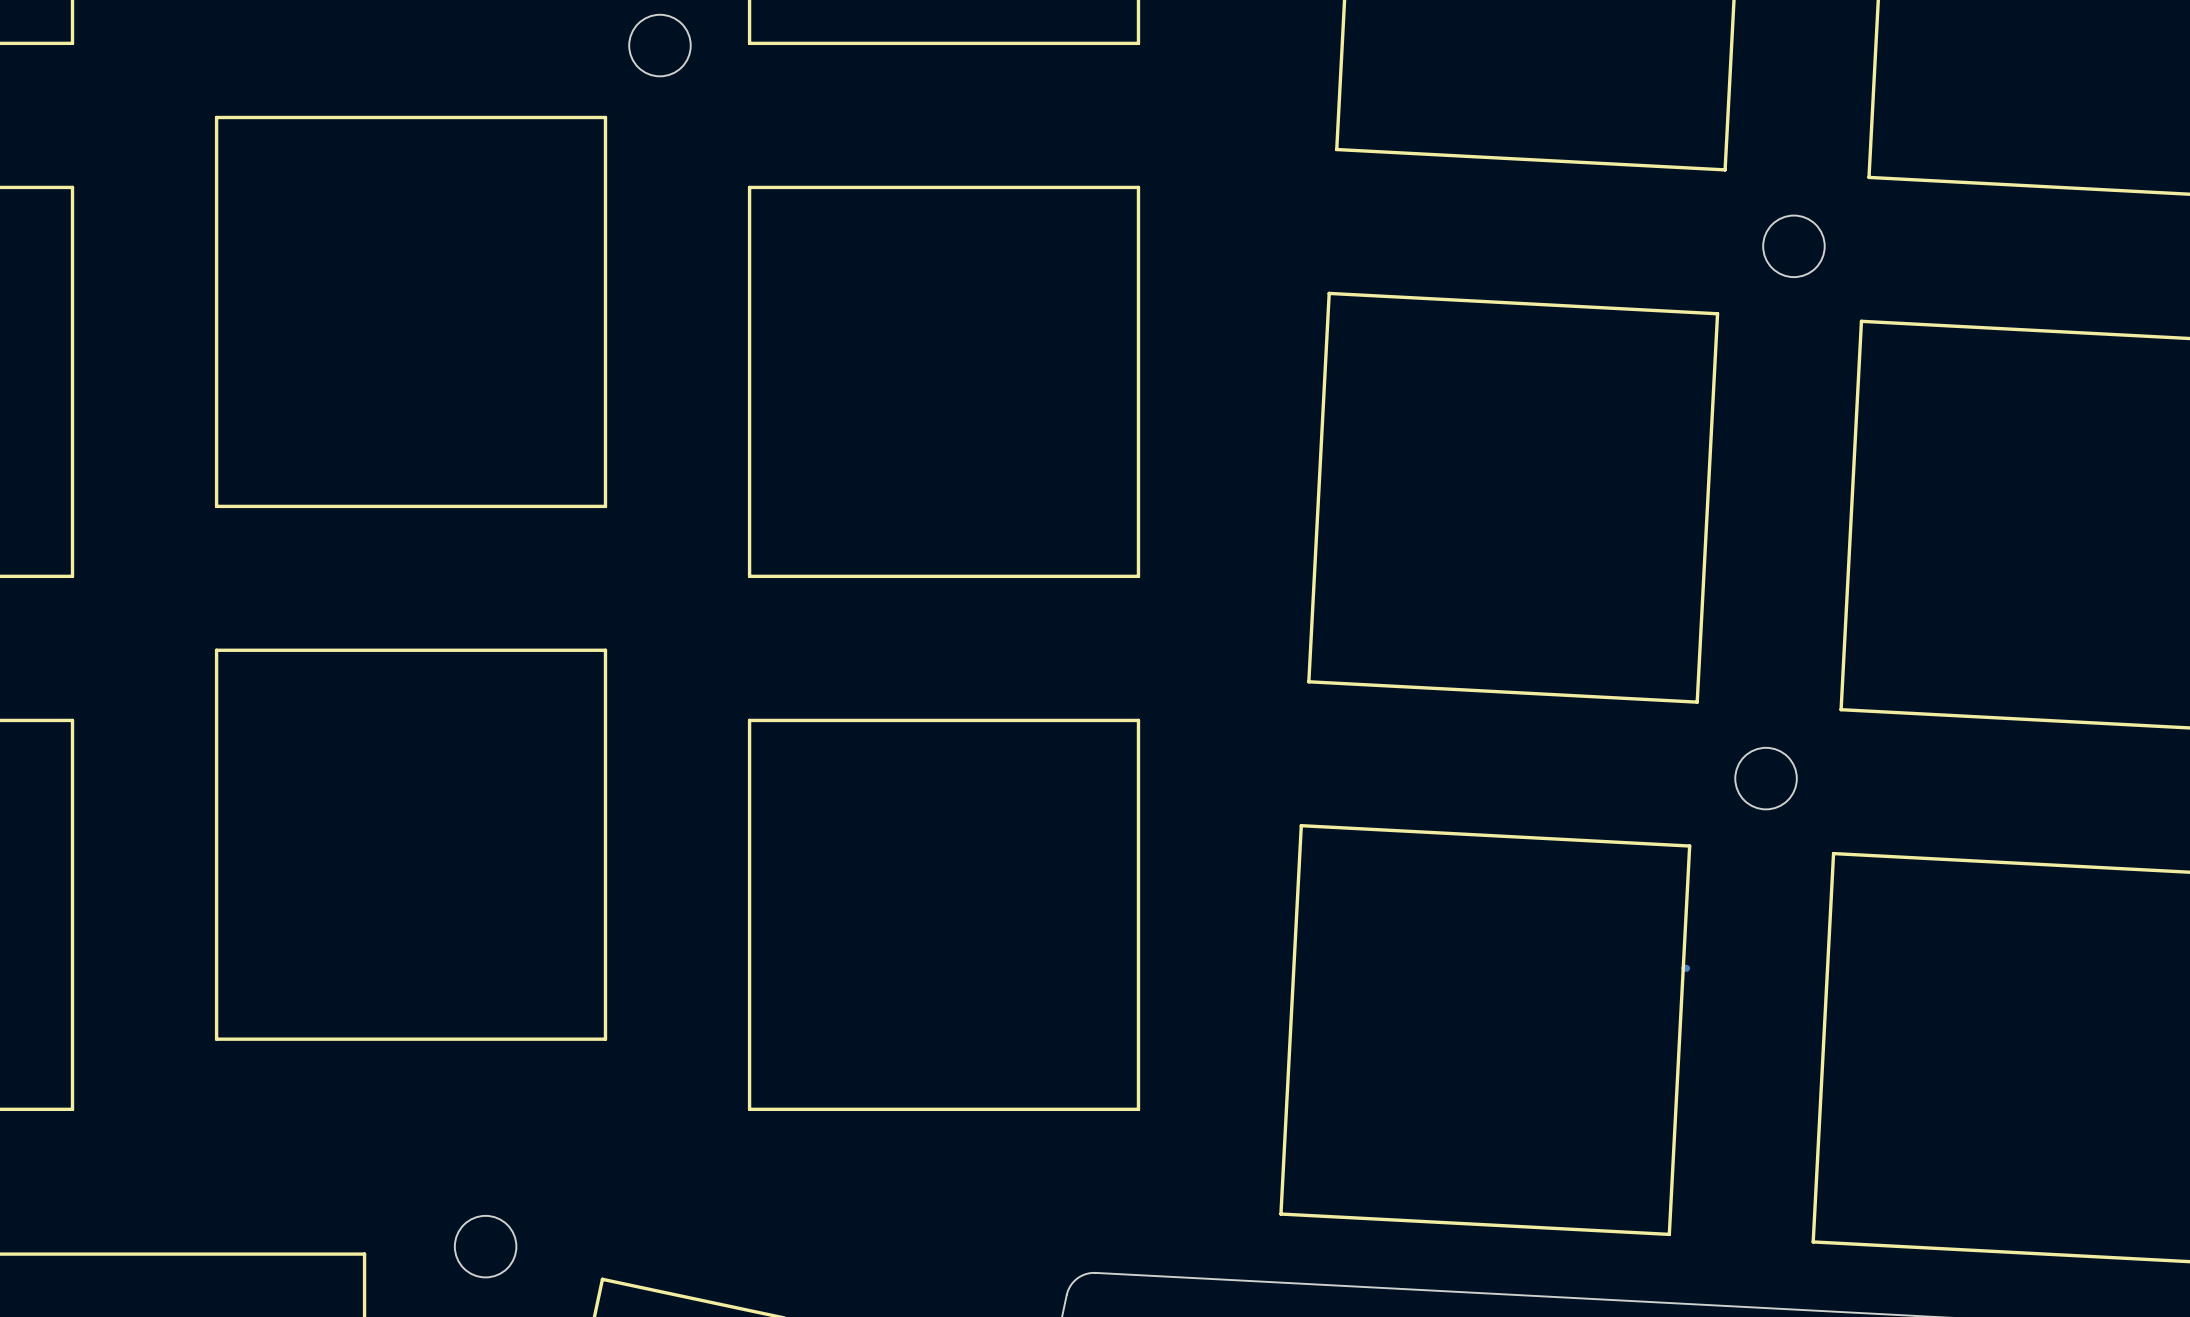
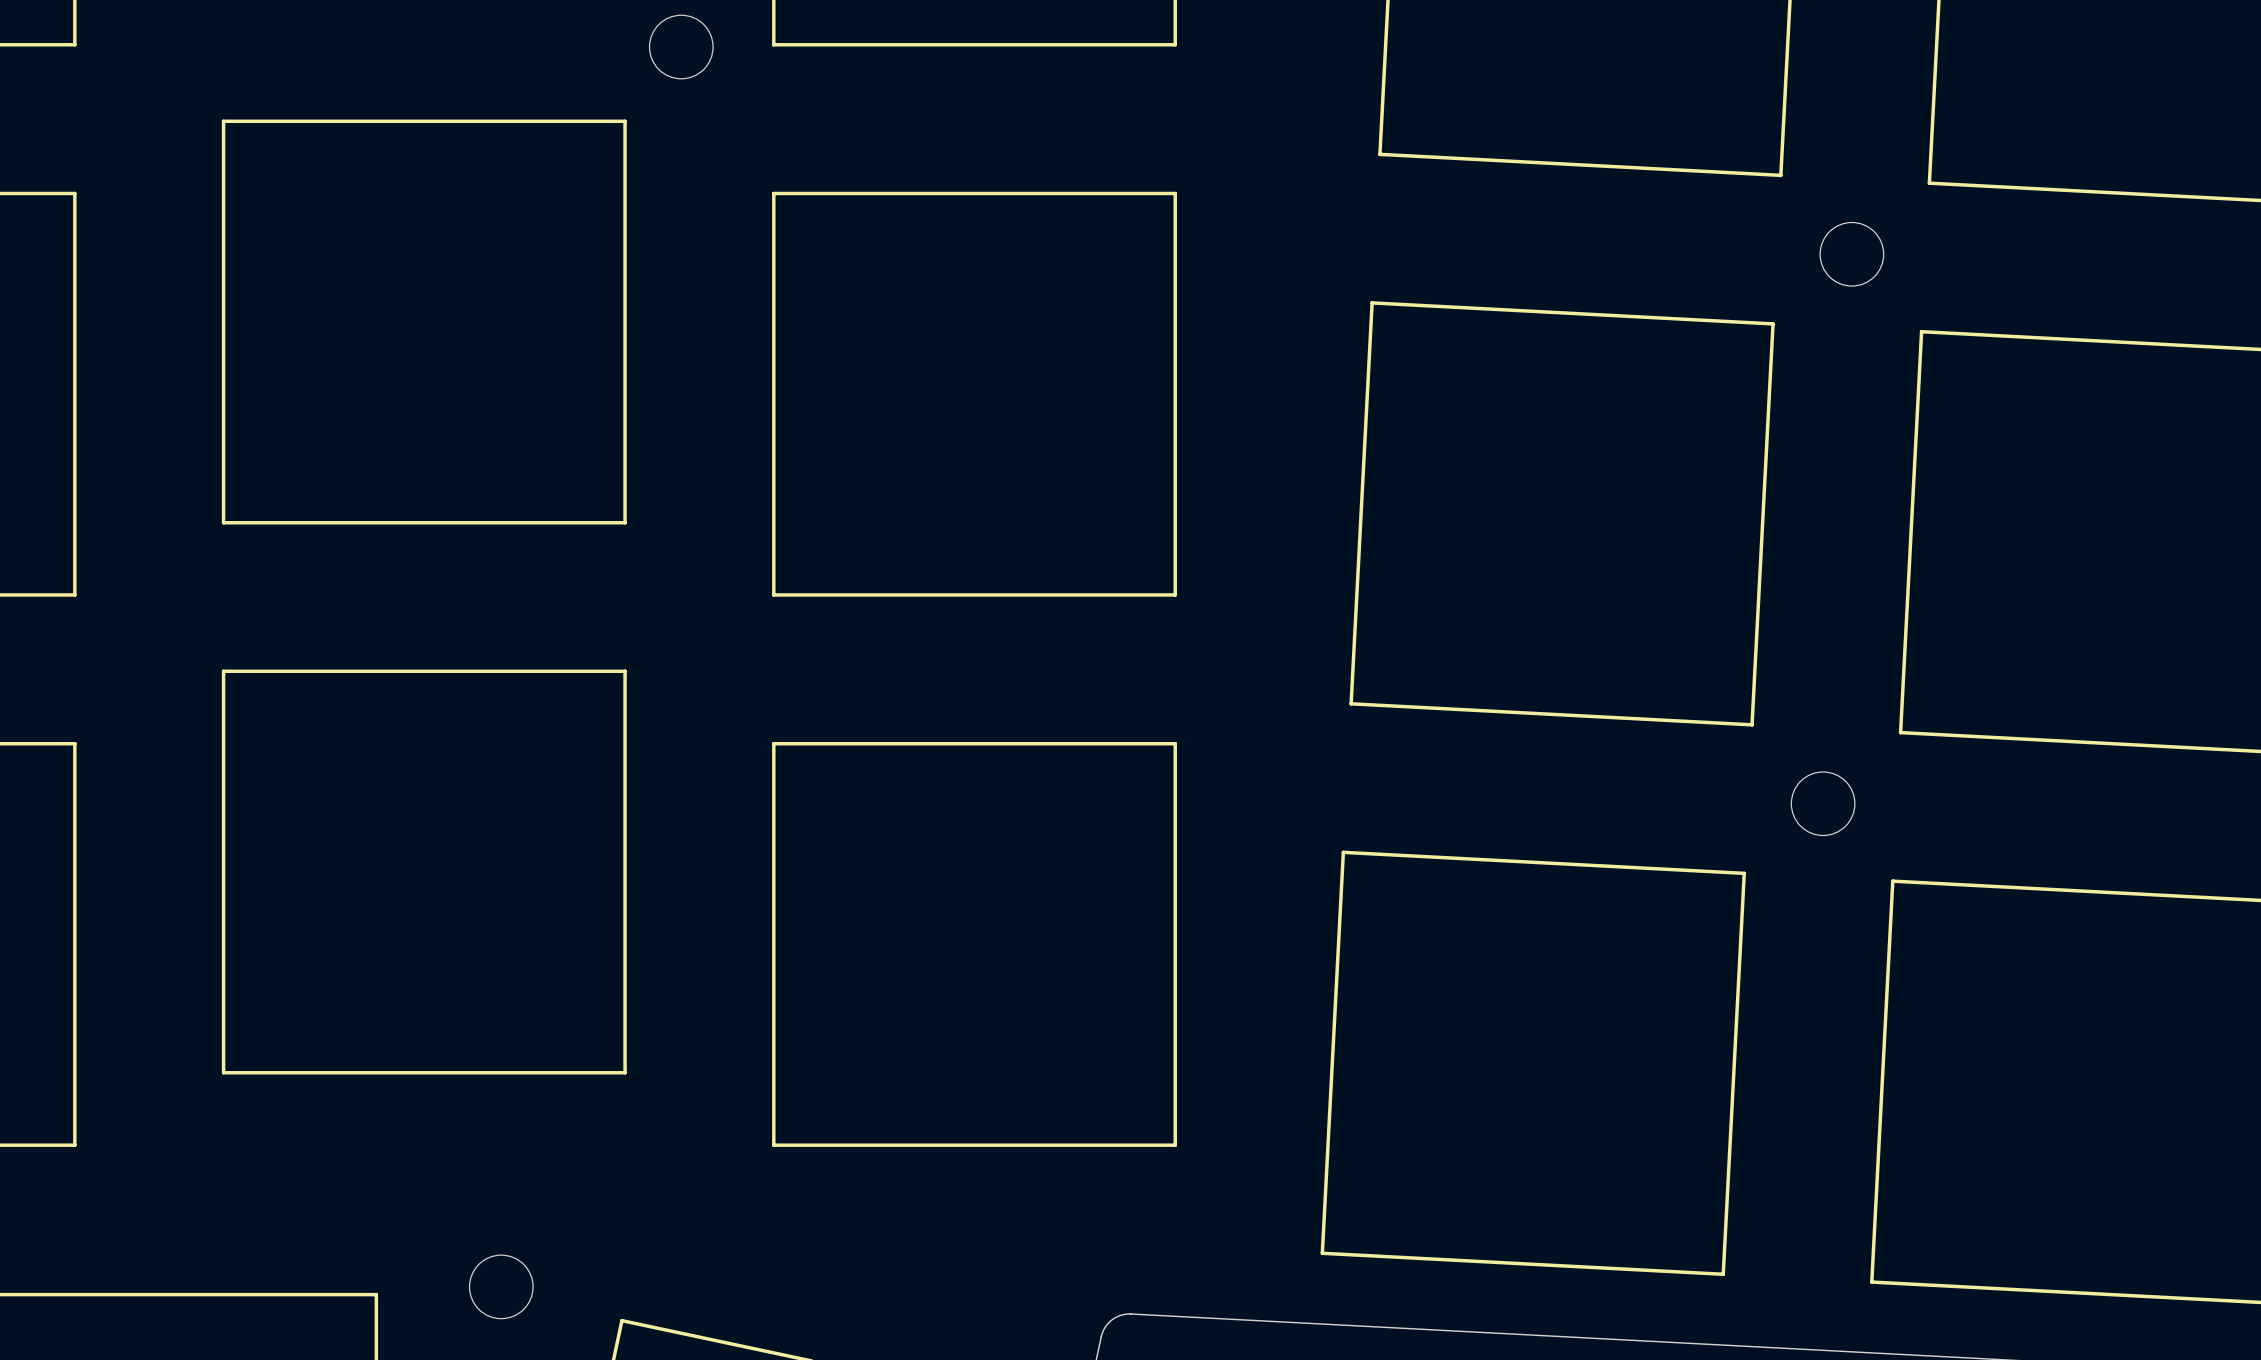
track: (1686, 968) (1684, 968) -> none

